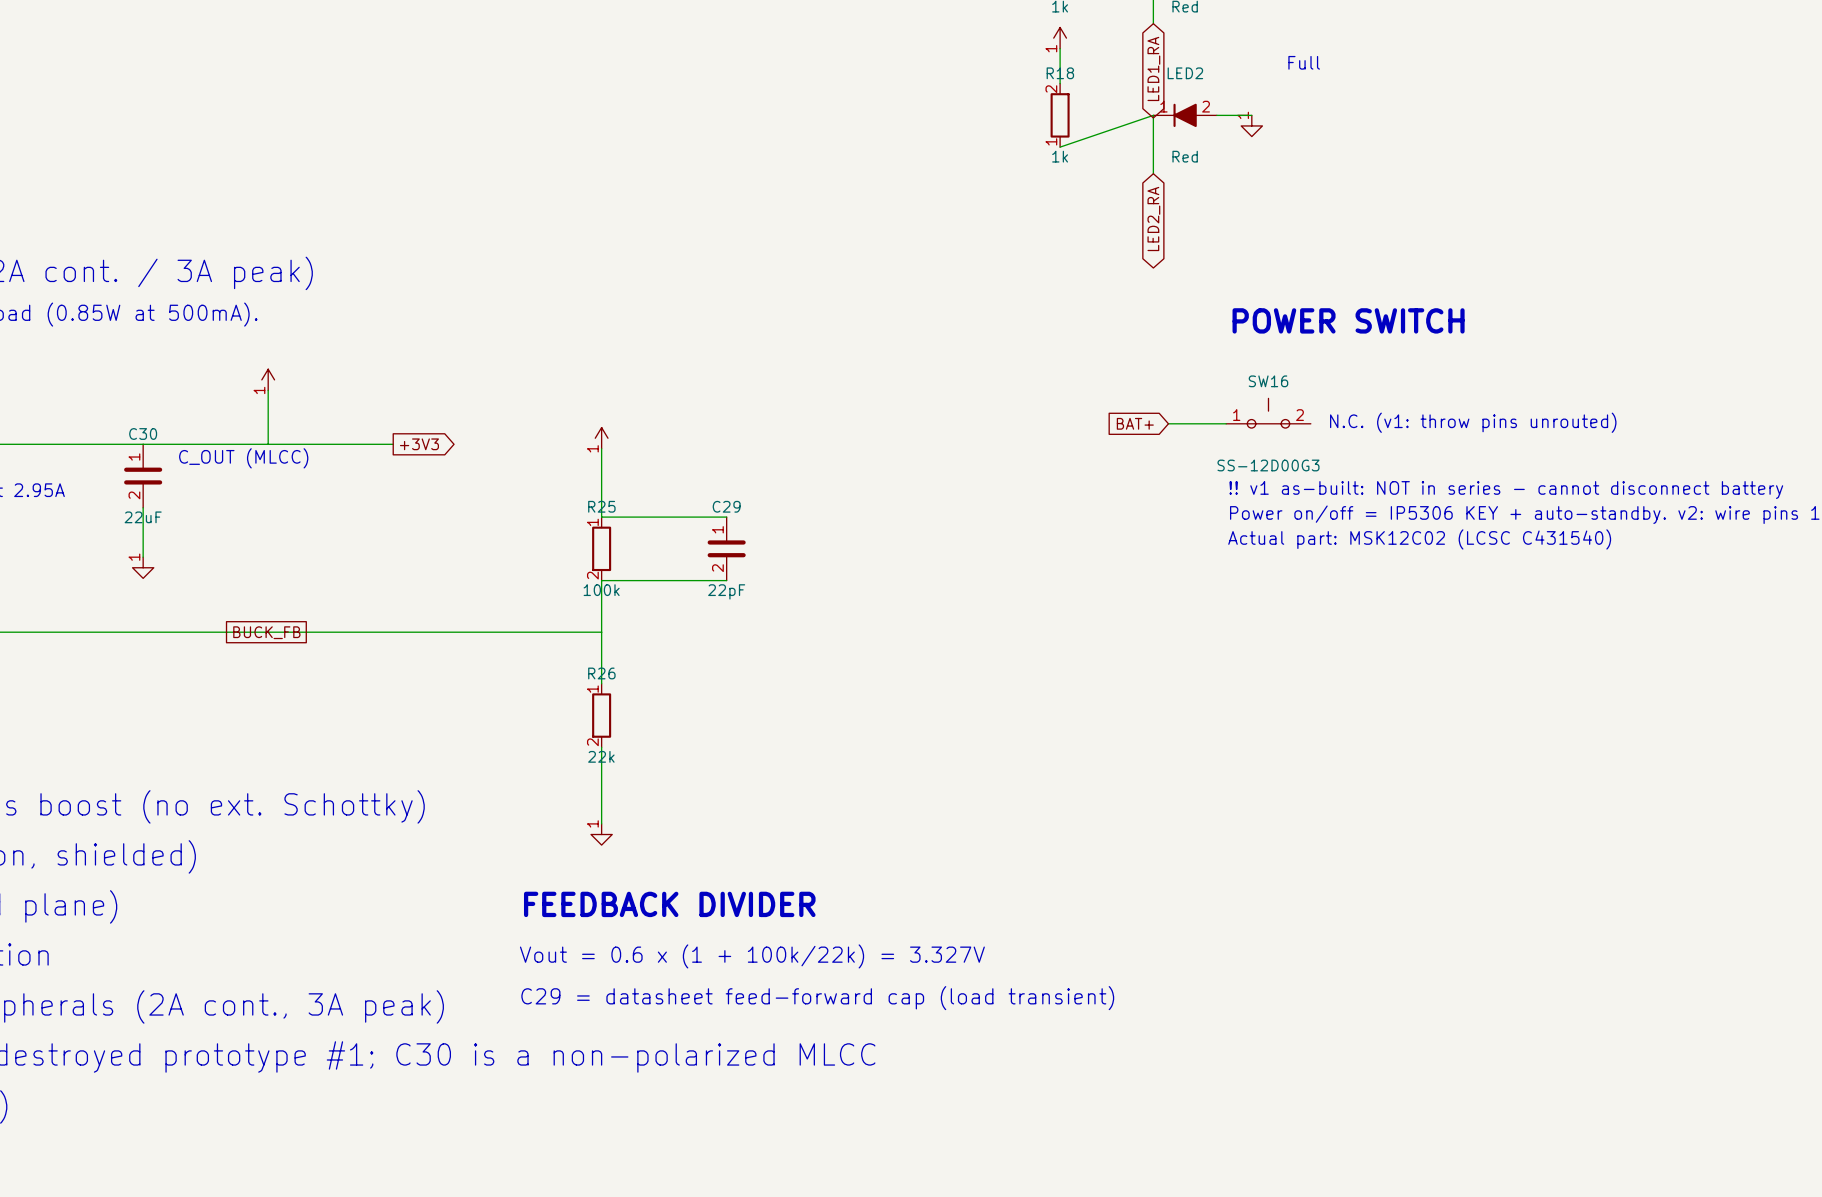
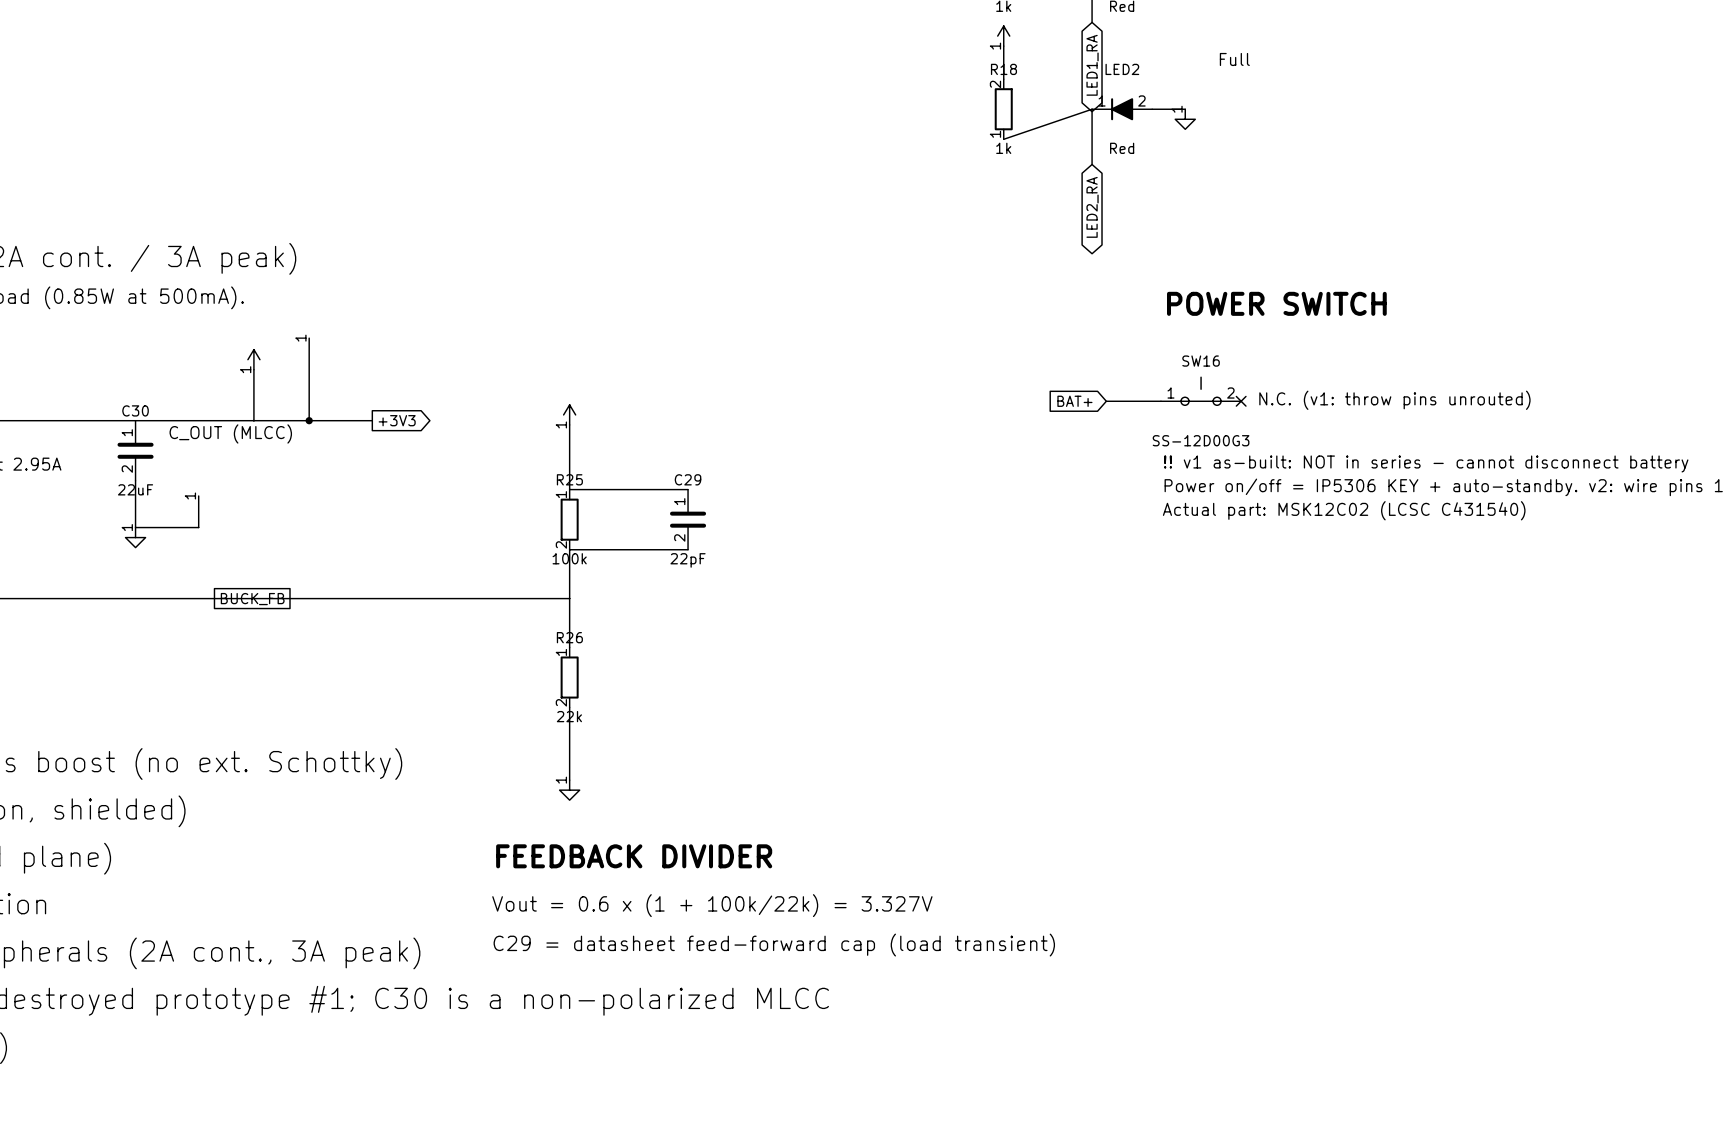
power symbol: none -> (300, 338)
wire: none -> (309, 338) (309, 420)
no-connect mark: none -> (1241, 401)
junction: none -> (309, 420)
power symbol: none -> (190, 495)
wire: none -> (198, 495) (198, 527) (135, 527)

